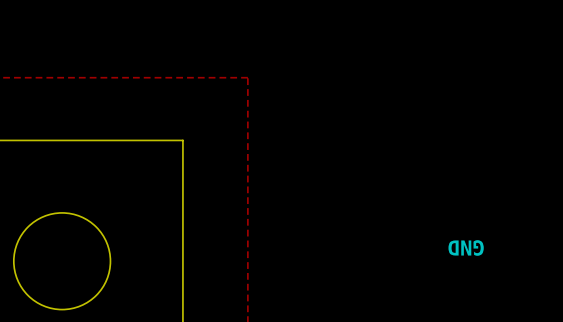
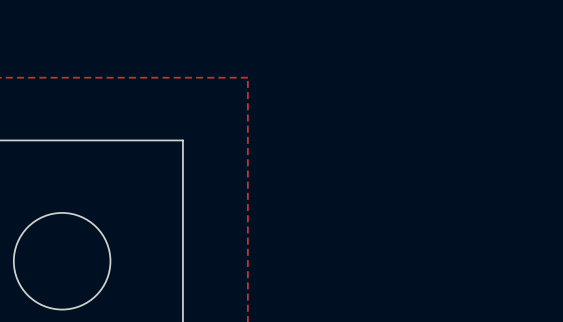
text: GND (466, 247) -> none

